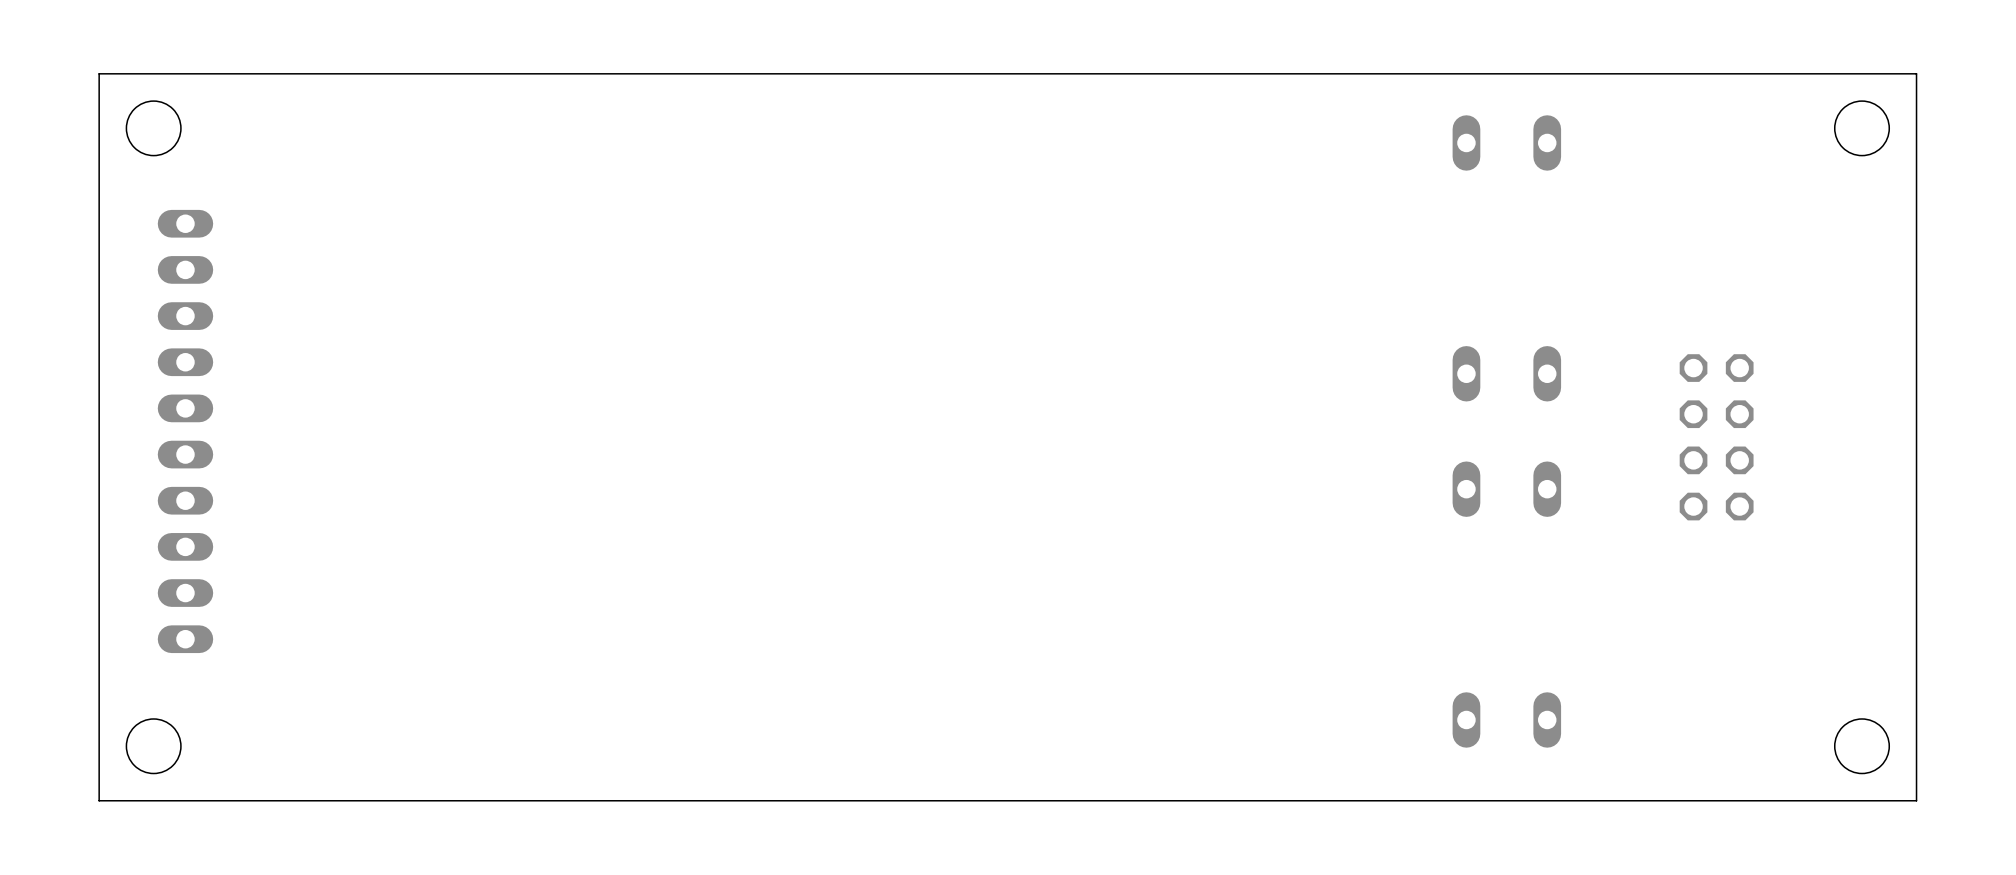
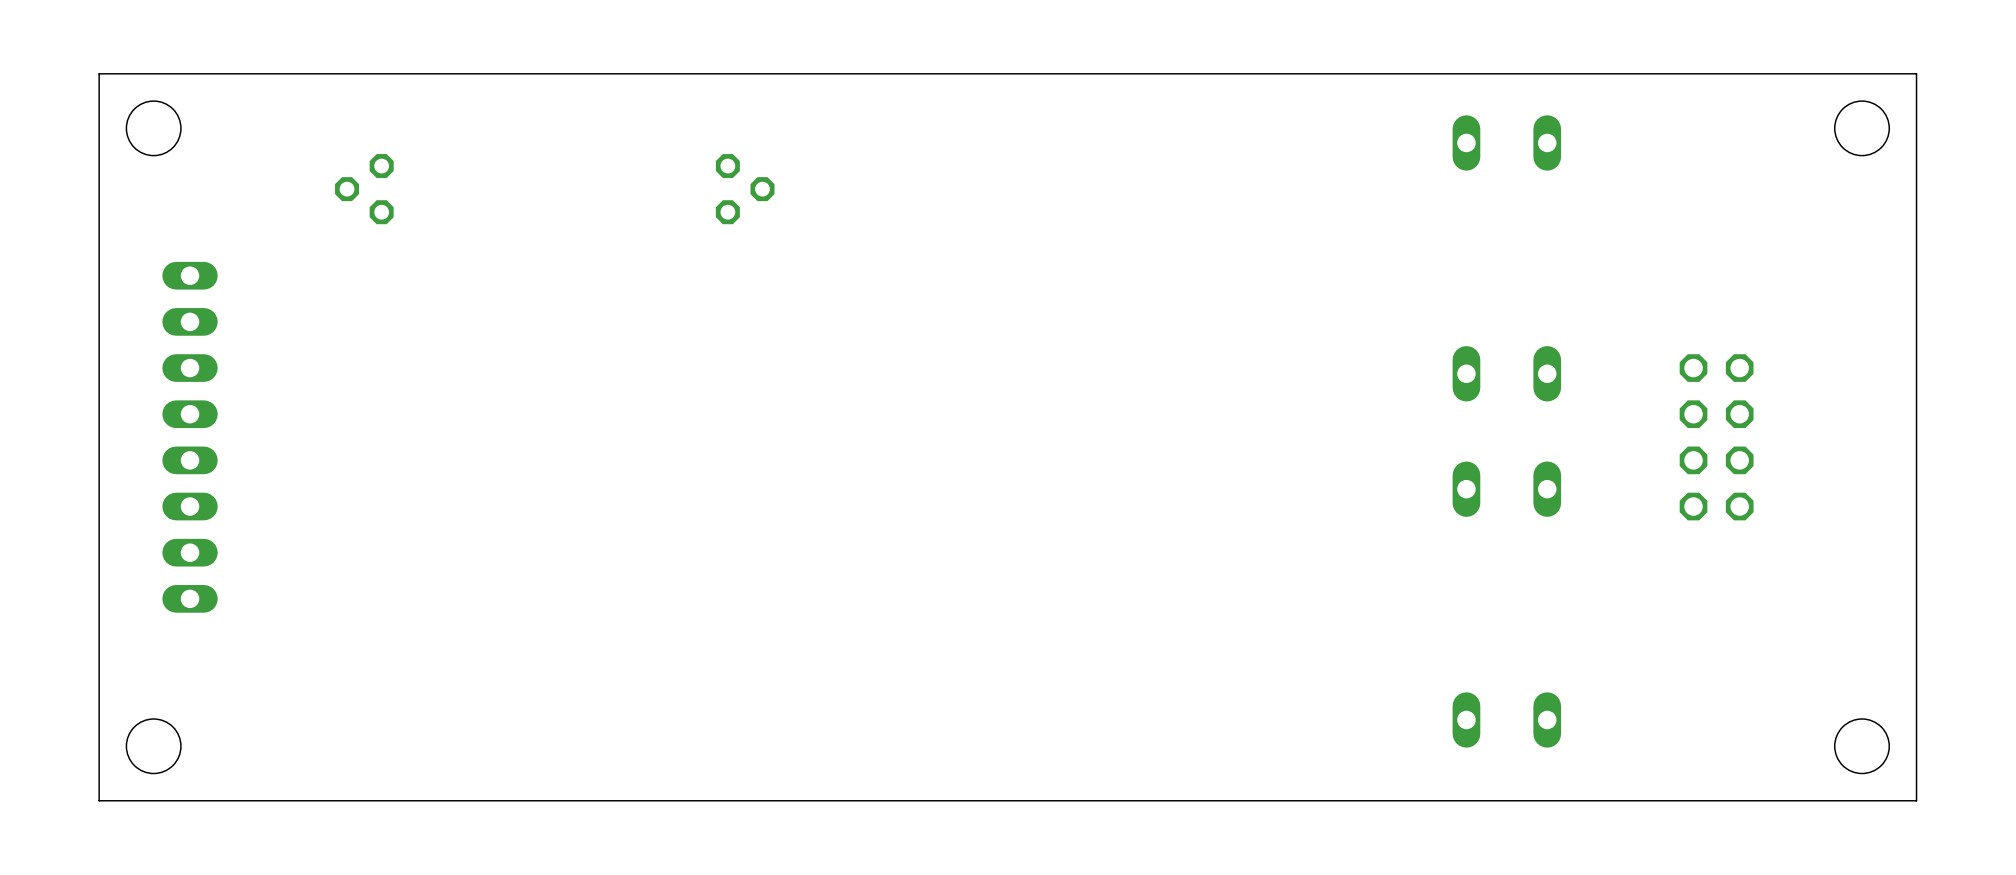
part: none -> (364, 189)
part: none -> (745, 189)
part footprint: [157, 209, 214, 654] -> [162, 261, 218, 613]

